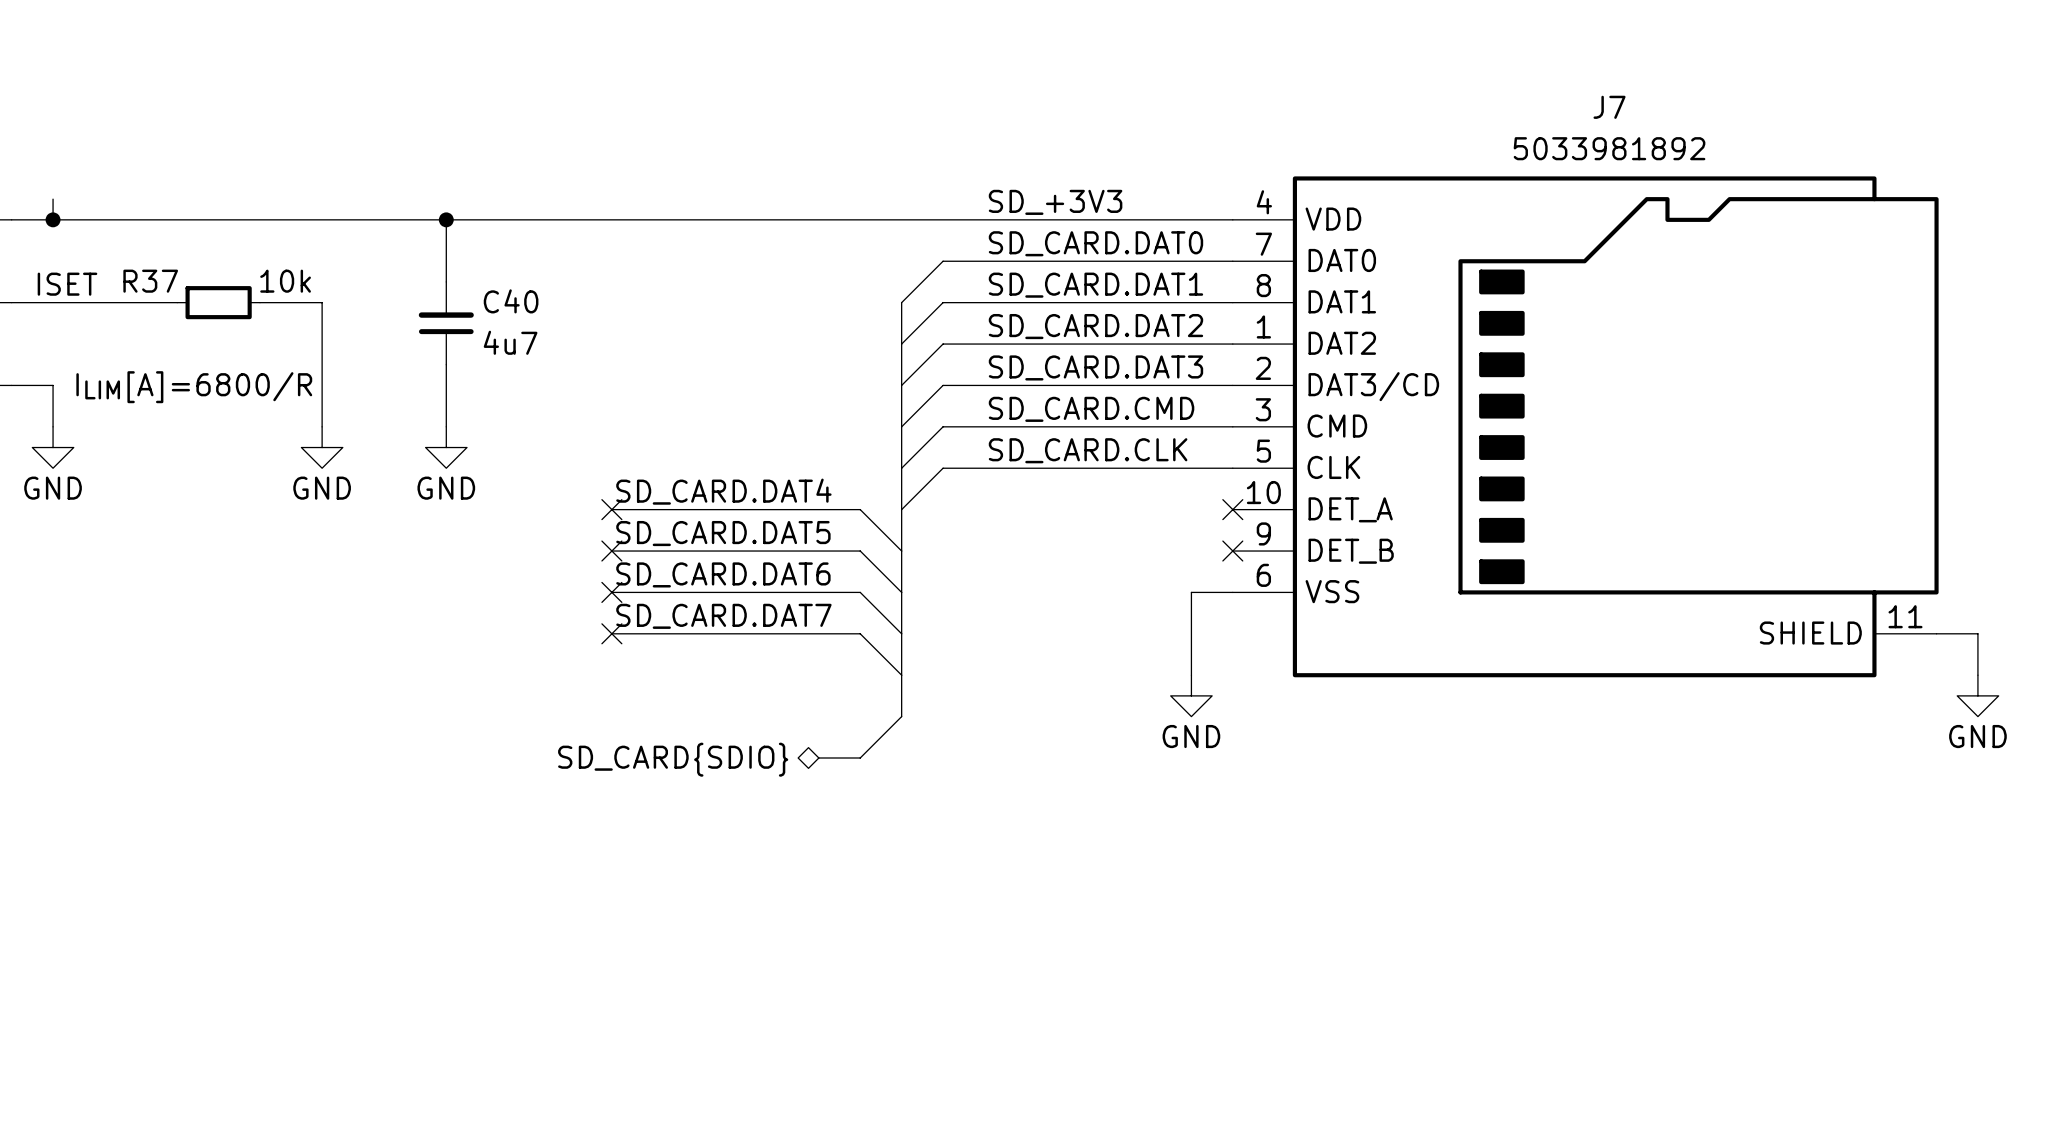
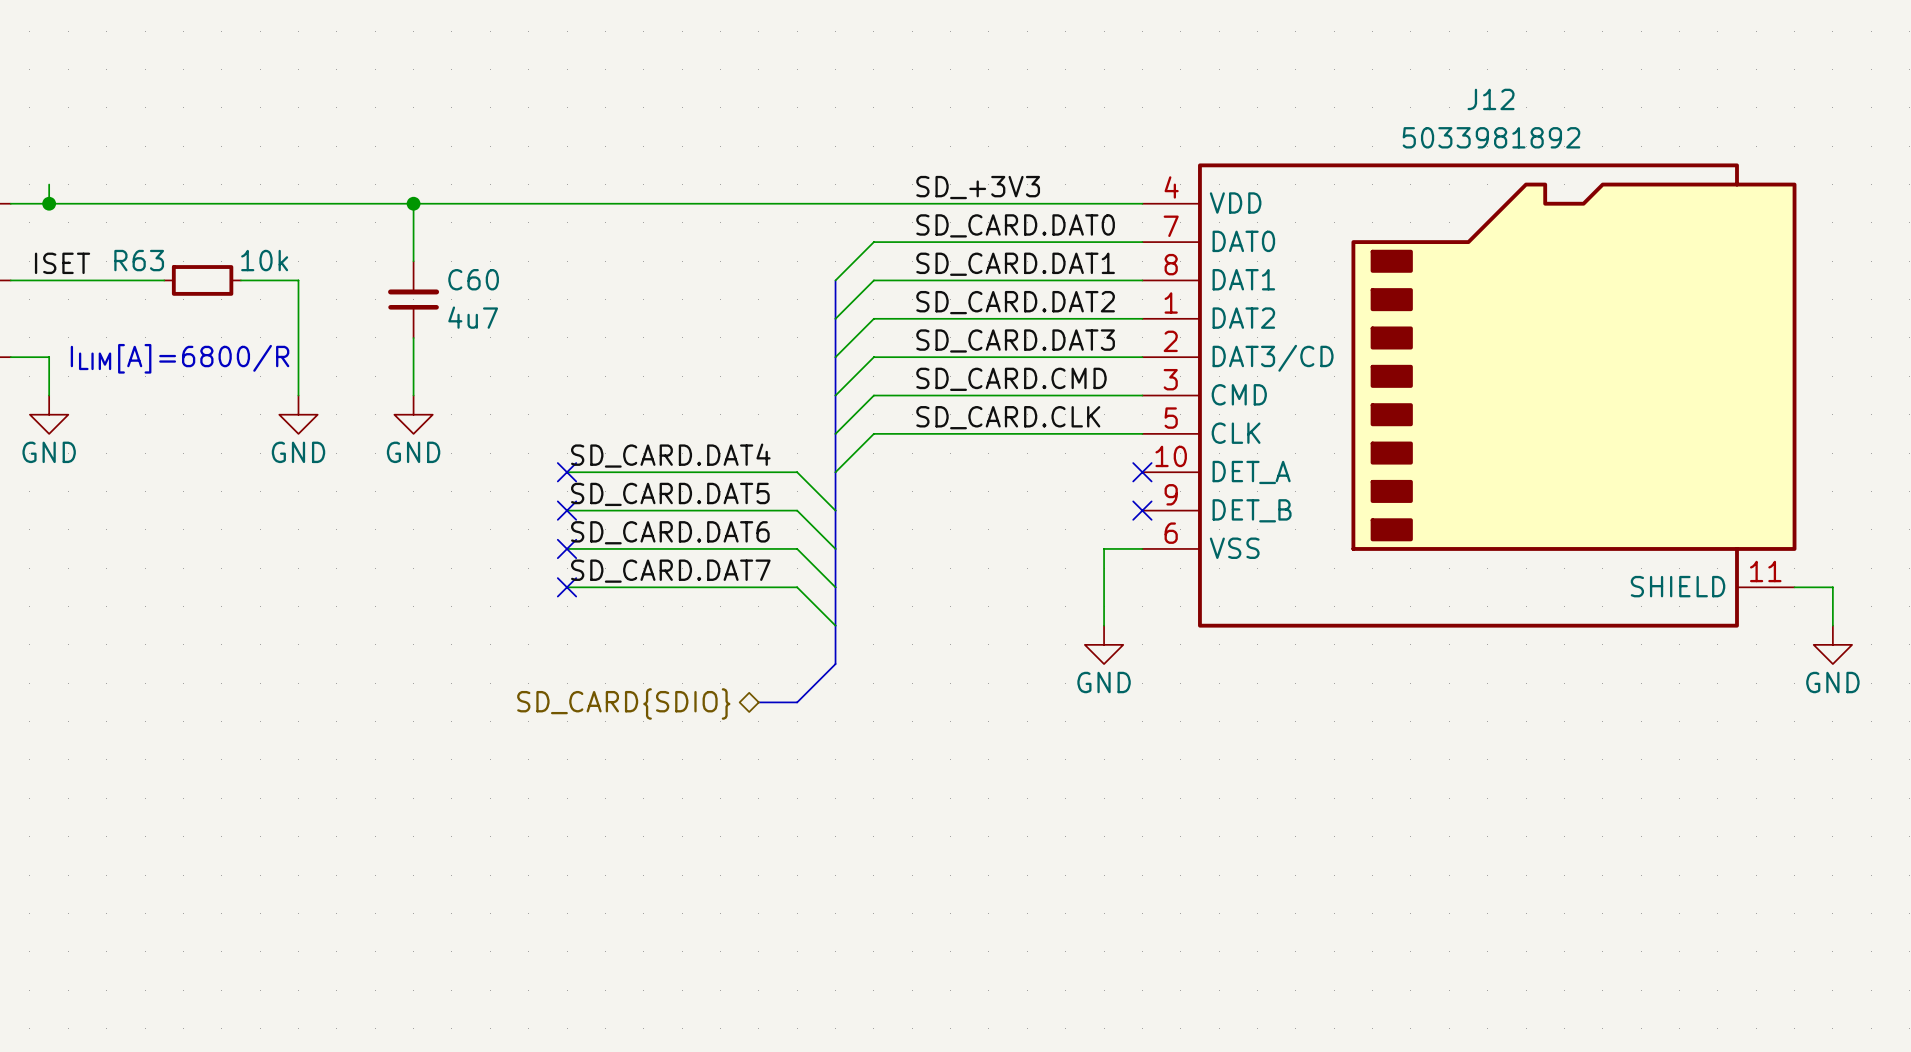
J7 name: J7 (1609, 107) -> J12 (1491, 99)
R37 name: R37 (150, 281) -> R63 (139, 260)
C40 name: C40 (511, 301) -> C60 (473, 279)

